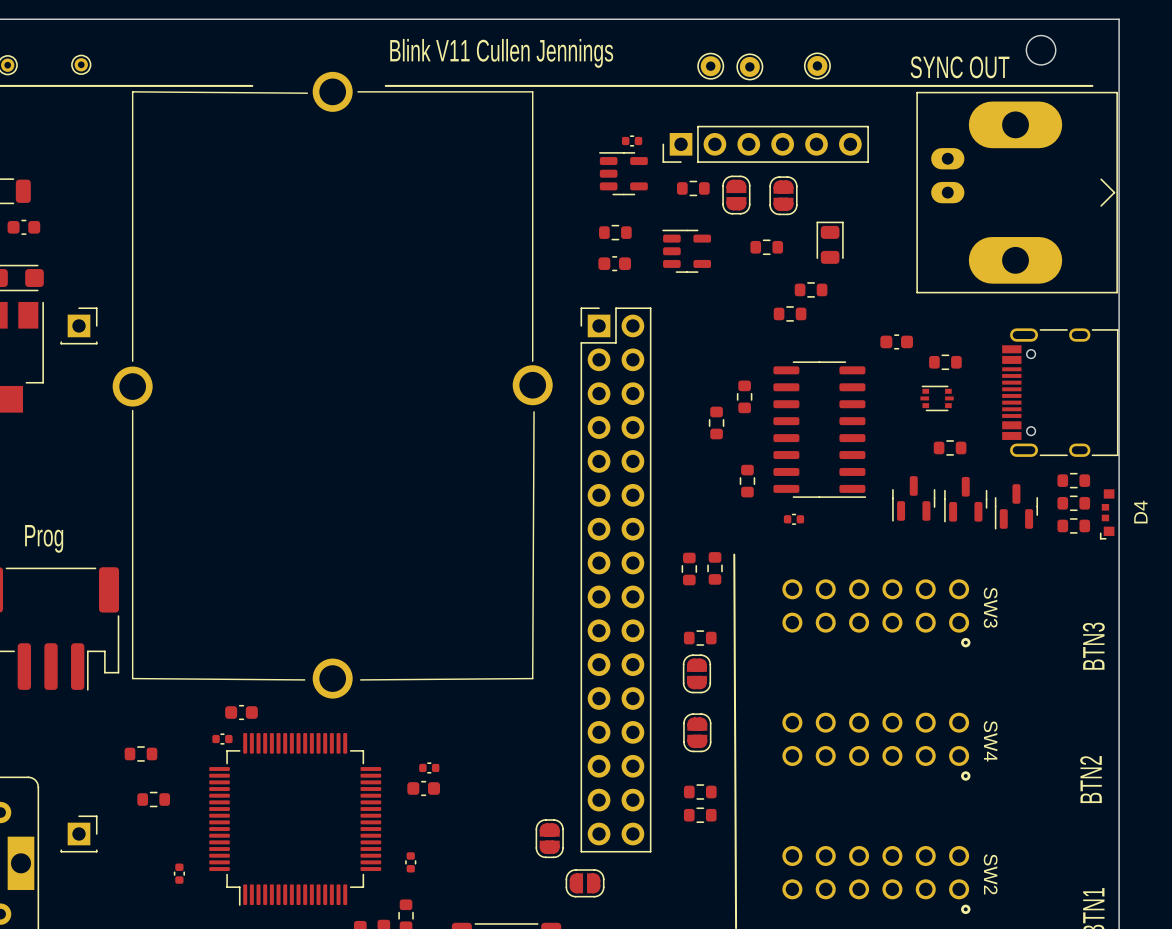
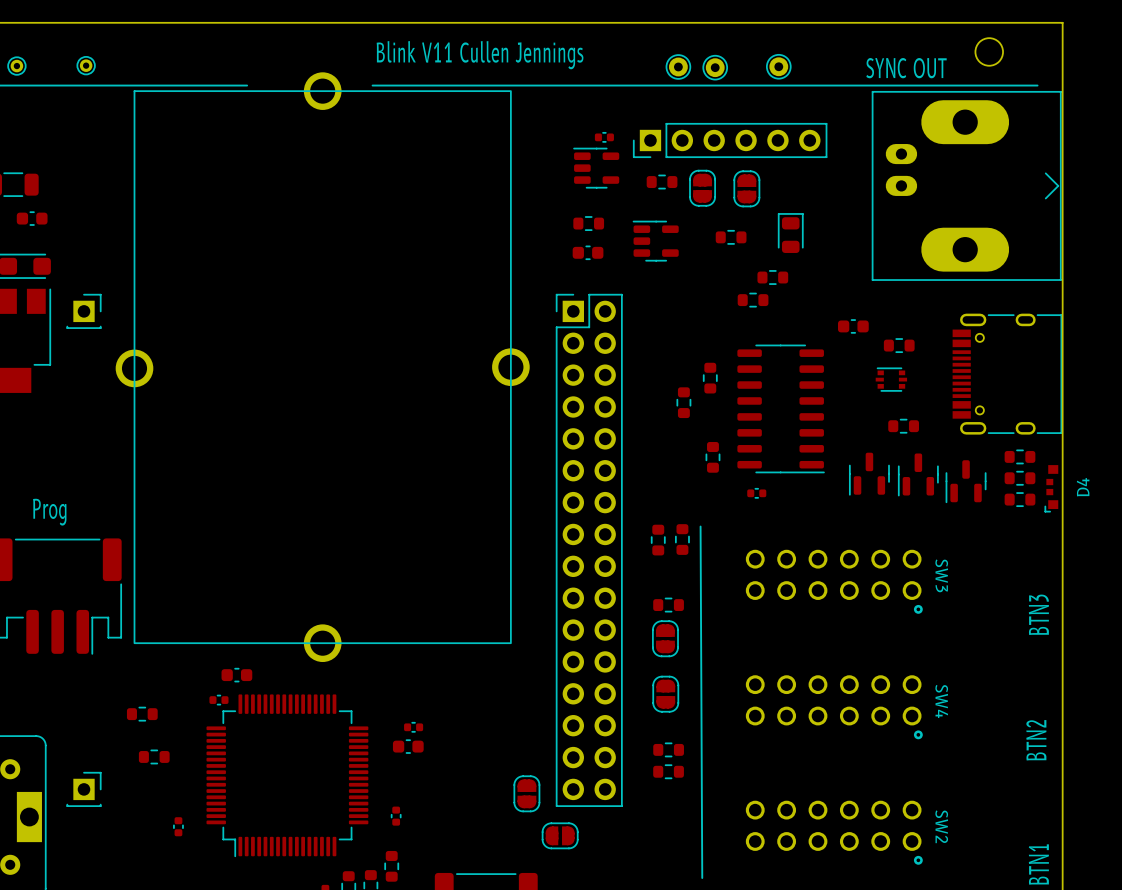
part footprint: [112, 71, 553, 699] -> [115, 72, 530, 663]

